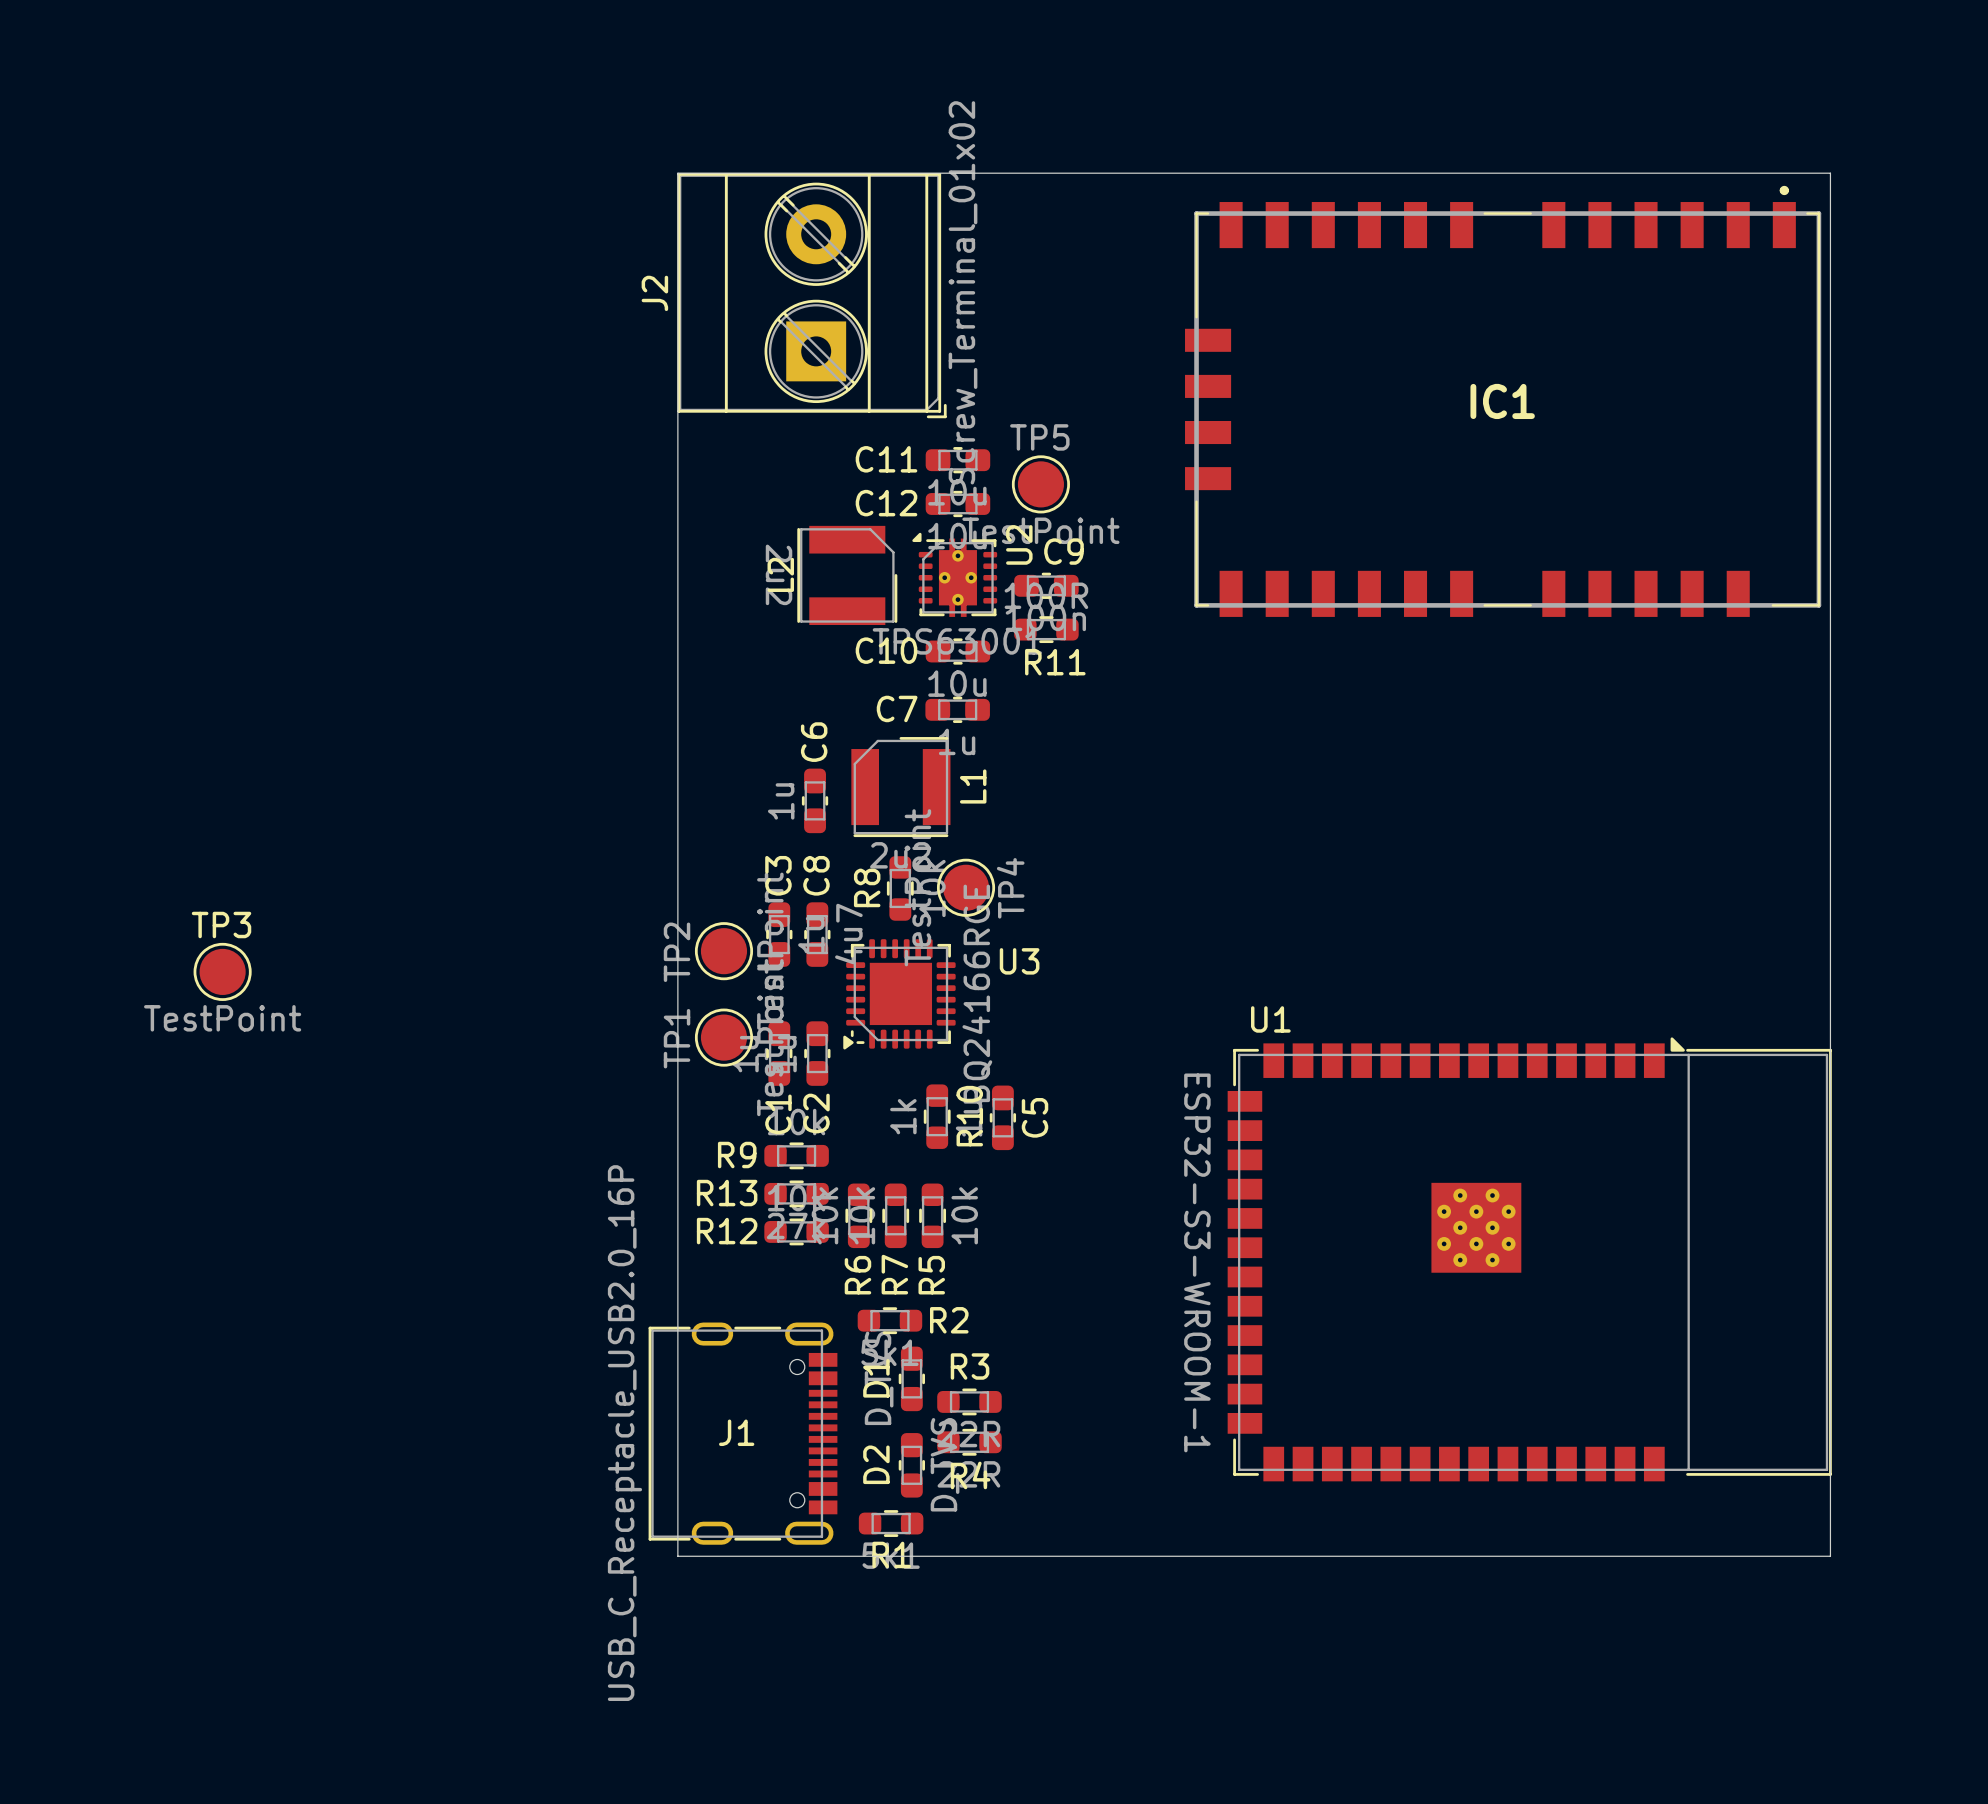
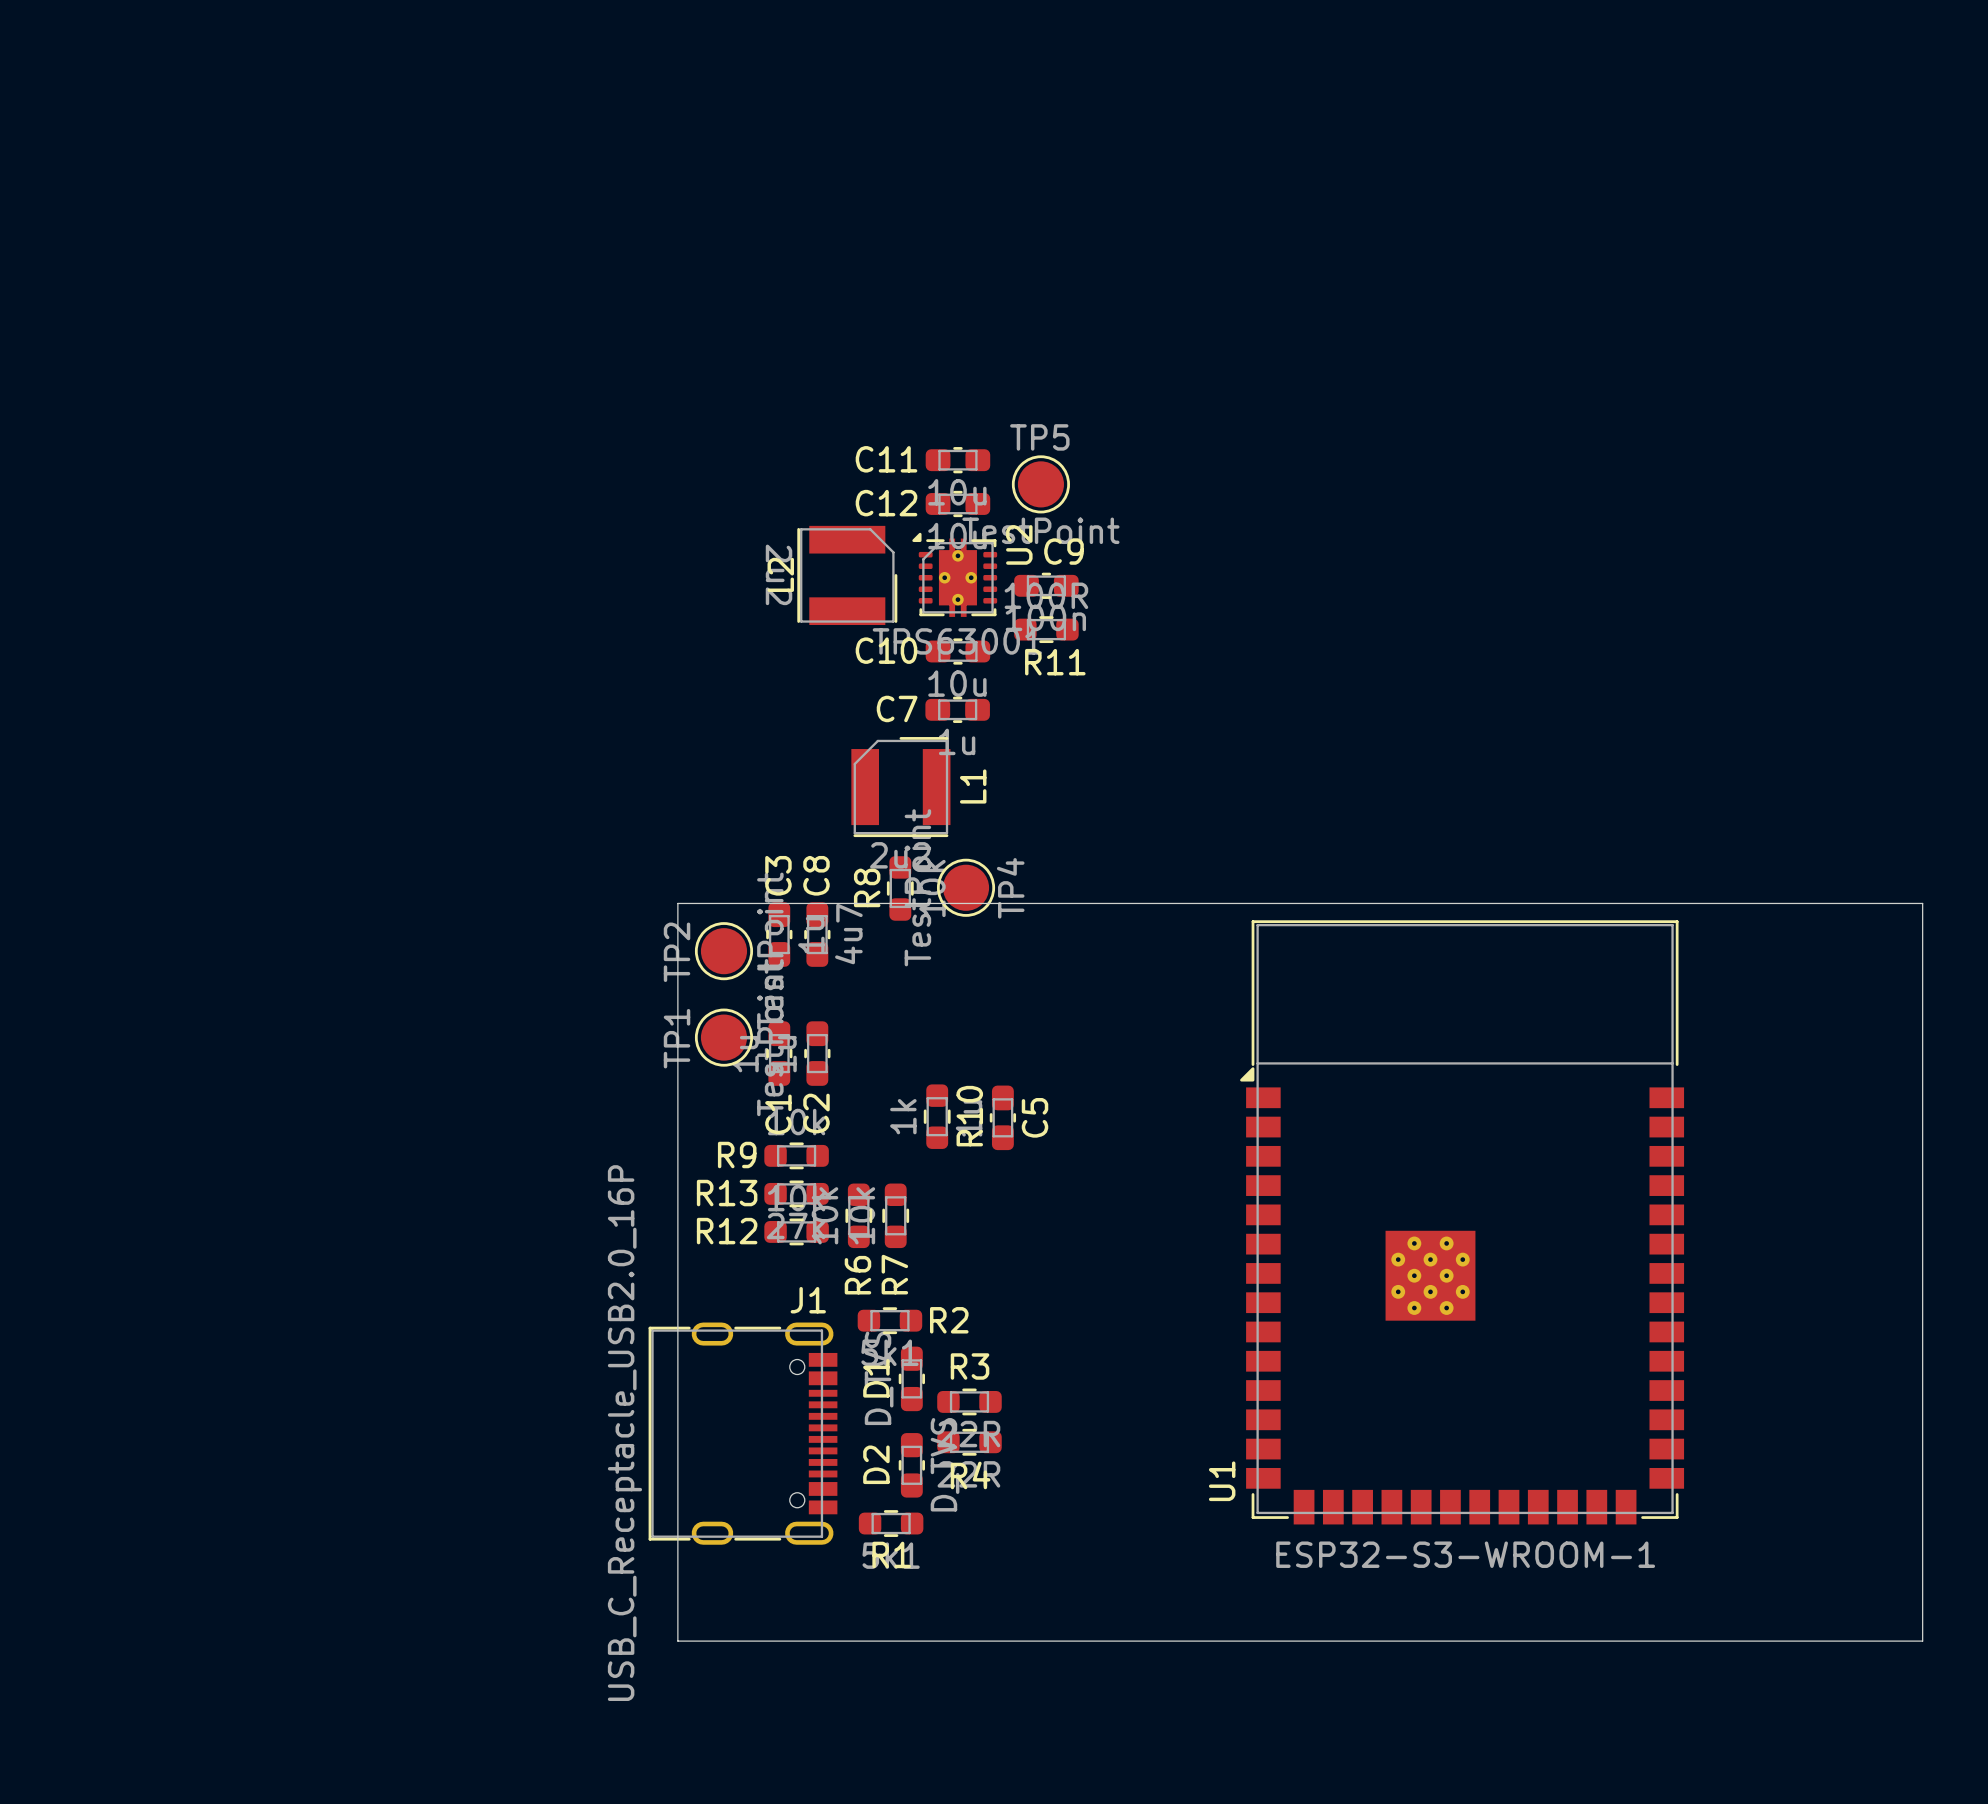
J2: Screw_Terminal_01x02 (812, 295) -> none
IC1: (1503, 401) -> none
C6: 1u (815, 800) -> none
board edge: (677, 903) (677, 173) (1830, 173) (1830, 1556) (677, 1556) -> (677, 903) (1922, 903) (1922, 1641) (677, 1641) (677, 1556)
TP3: TestPoint (222, 971) -> none
U3: BQ24166RGE (899, 994) -> none
R5: 10k (932, 1215) -> none
U1 rotation: 0° (1529, 1259) -> 90° counterclockwise (1462, 1222)
J1 name position: J1 (736, 1432) -> J1 (808, 1300)

